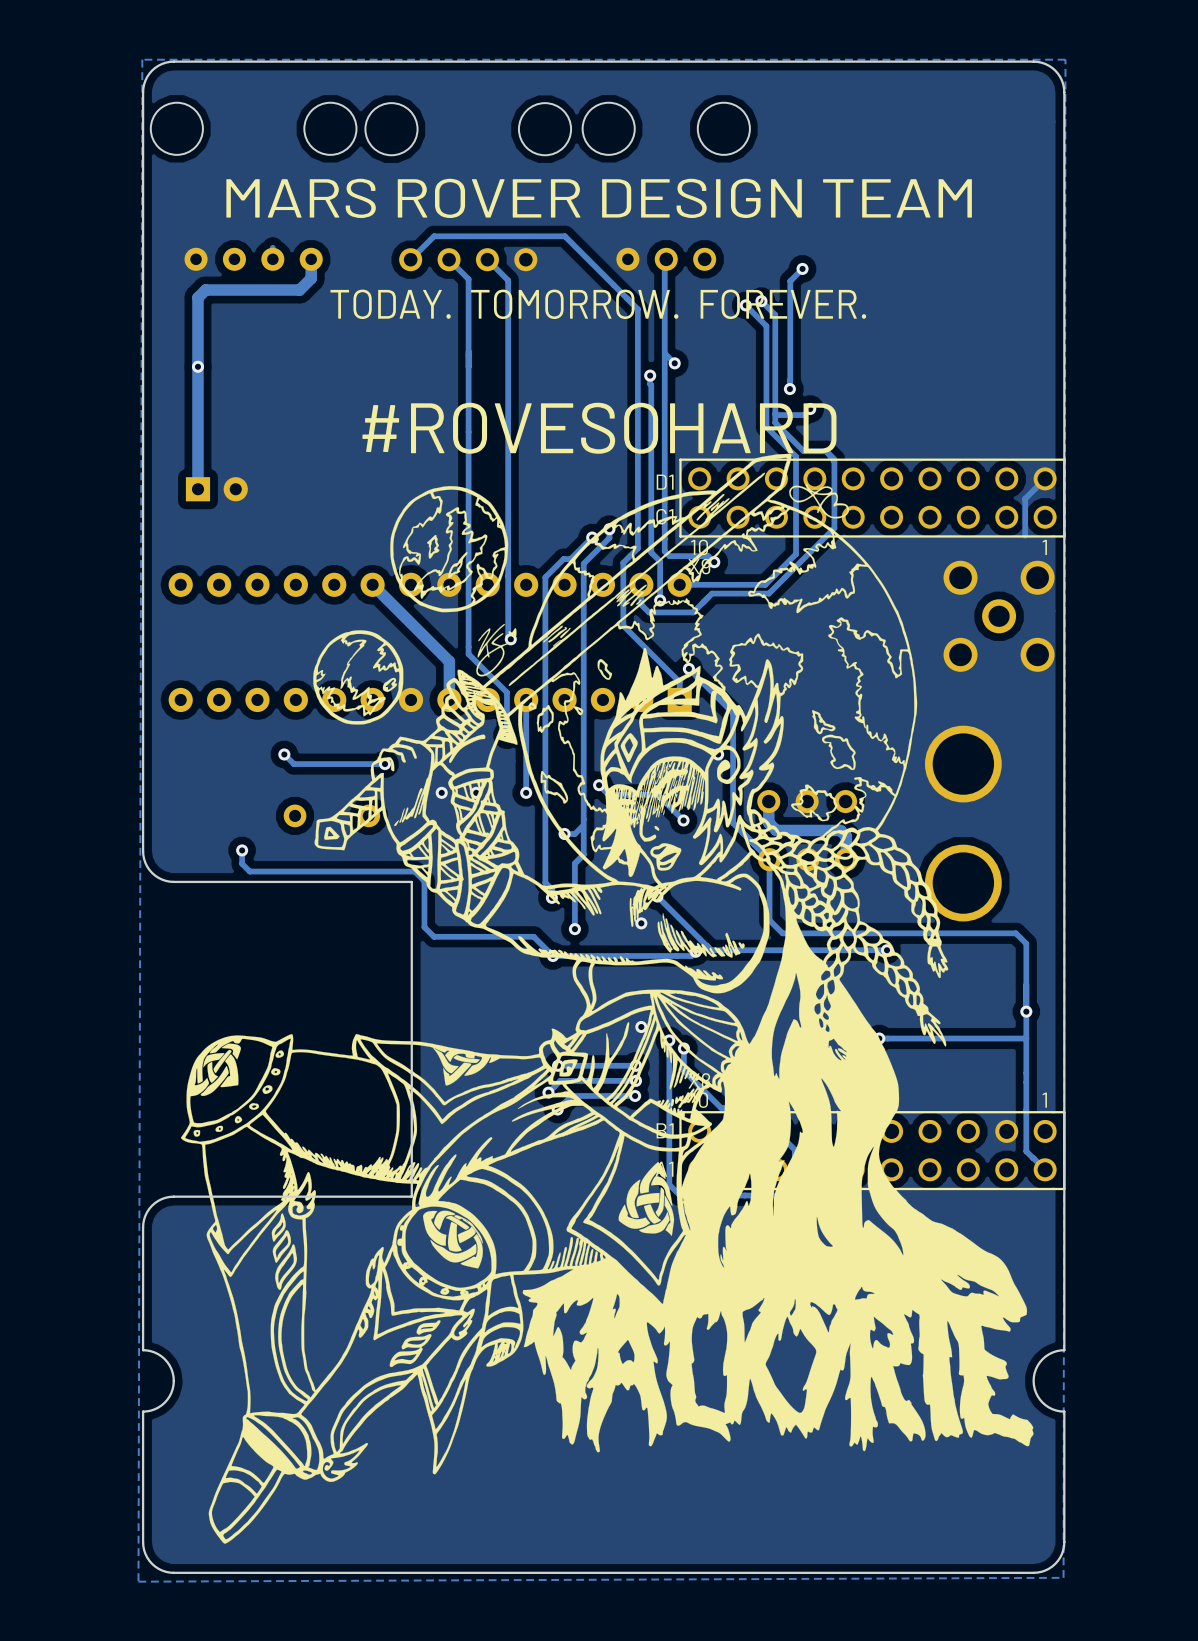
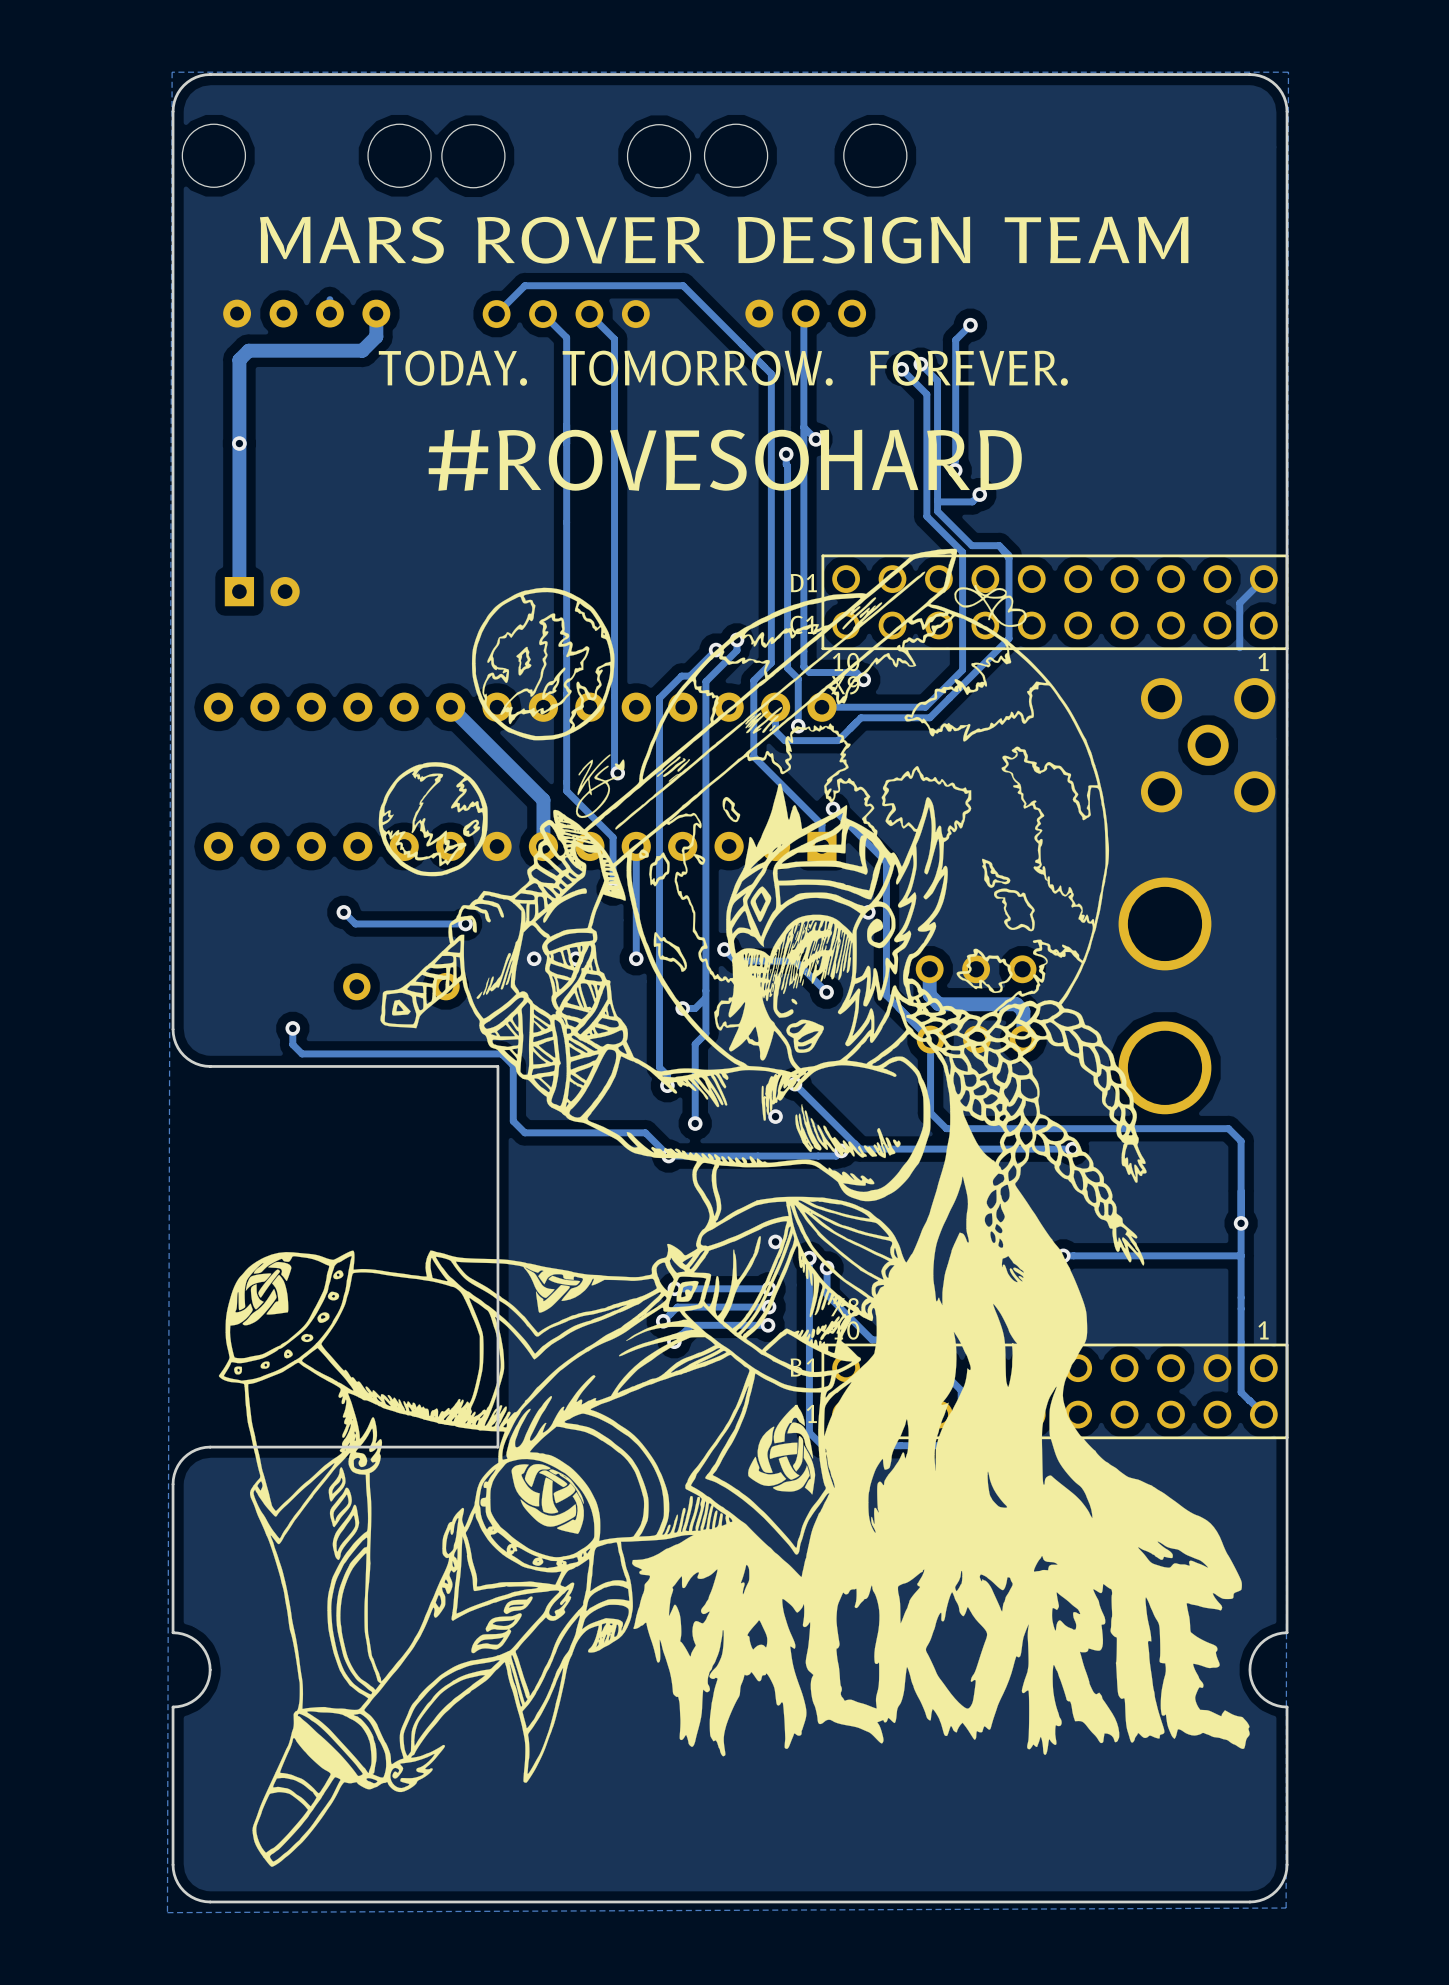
text position: #ROVESOHARD (599, 428) -> #ROVESOHARD (725, 460)

